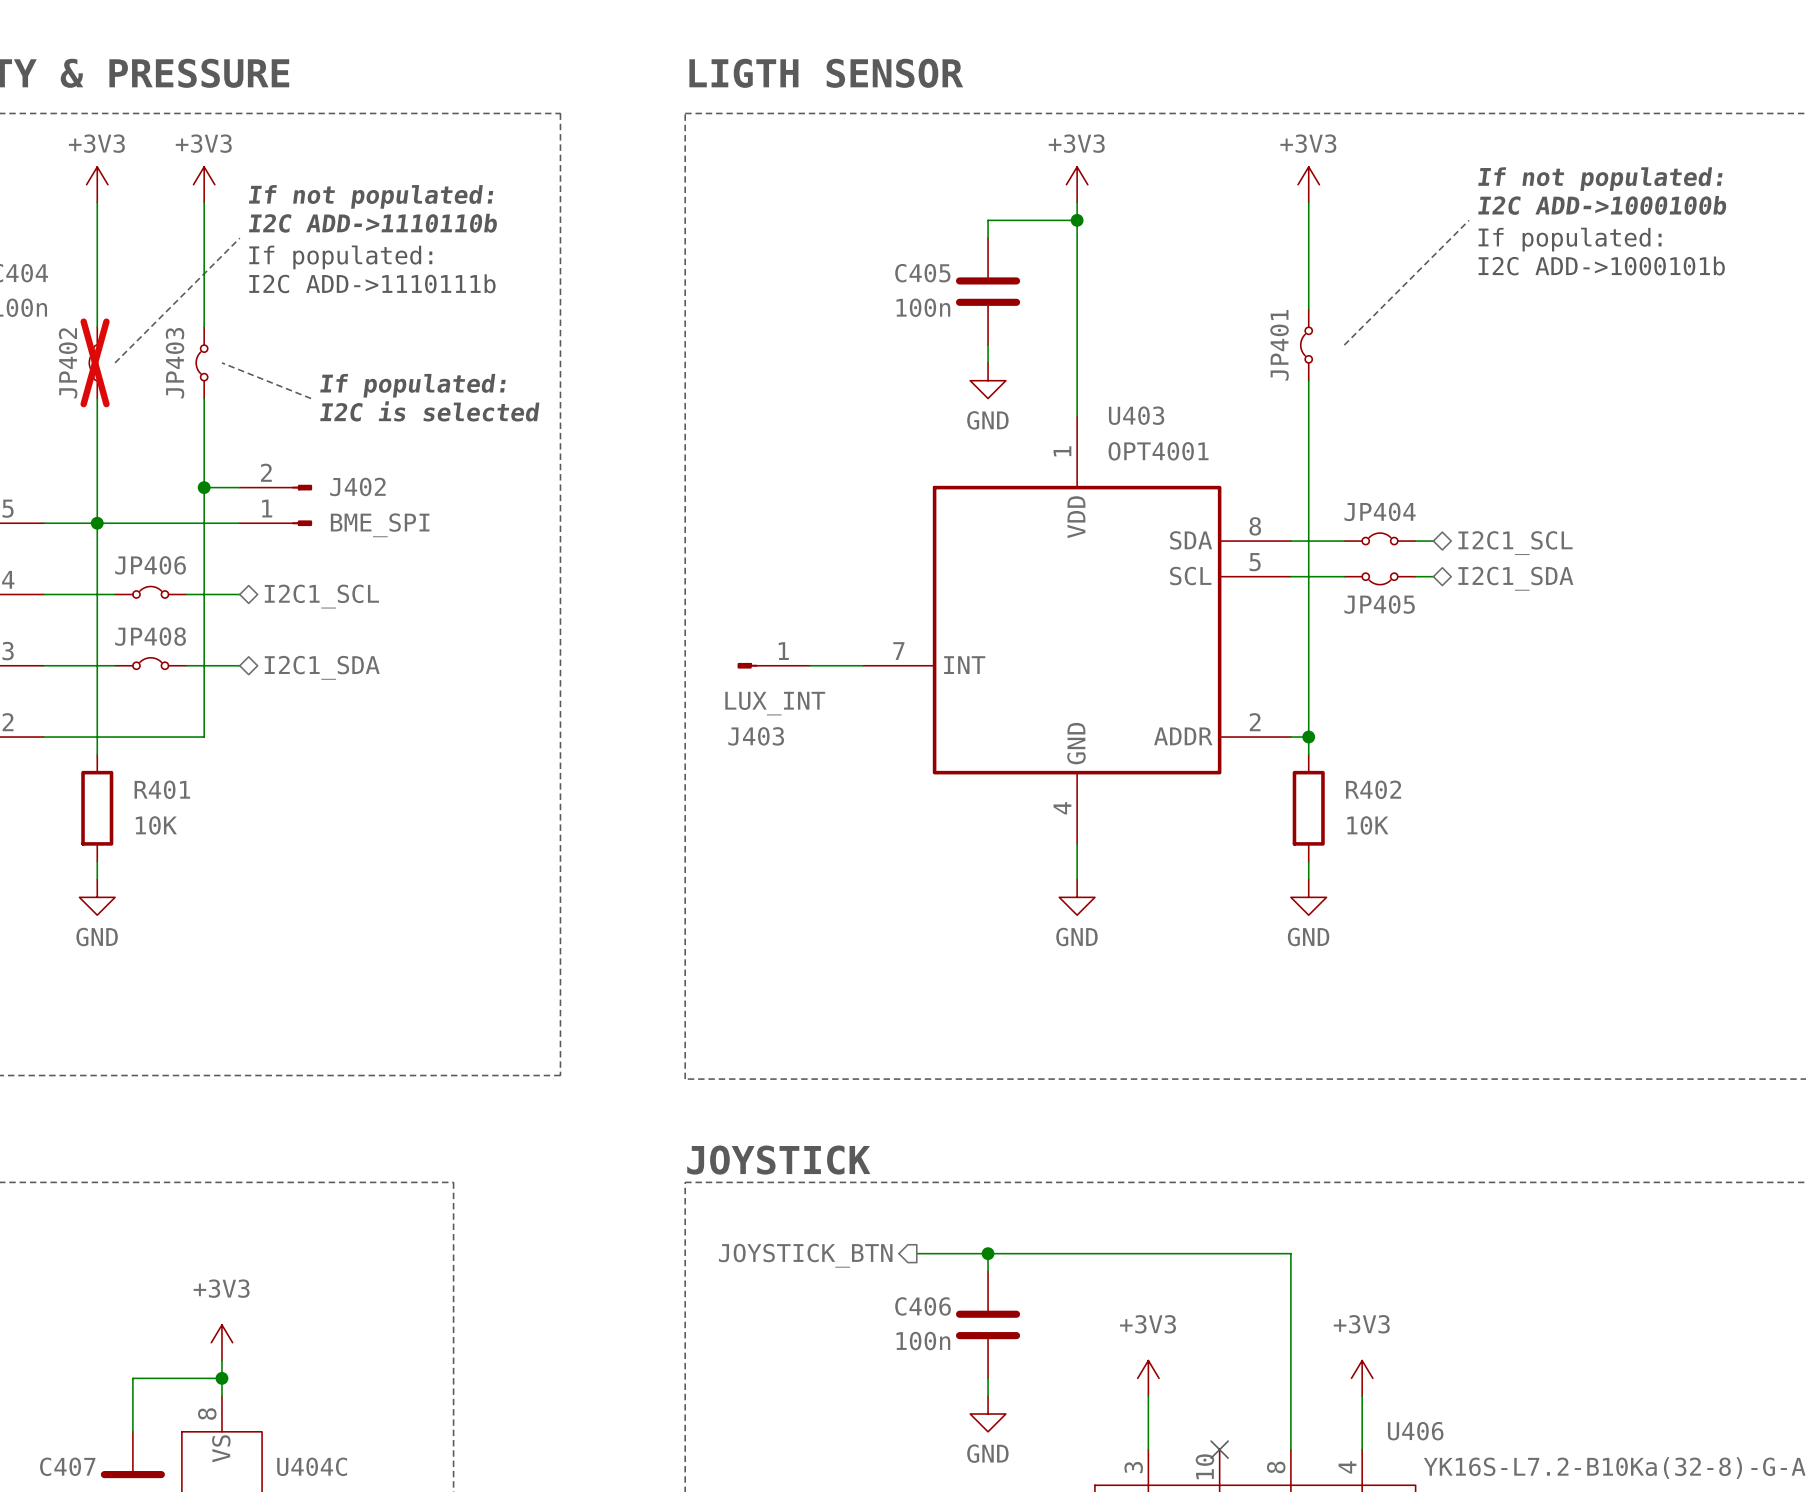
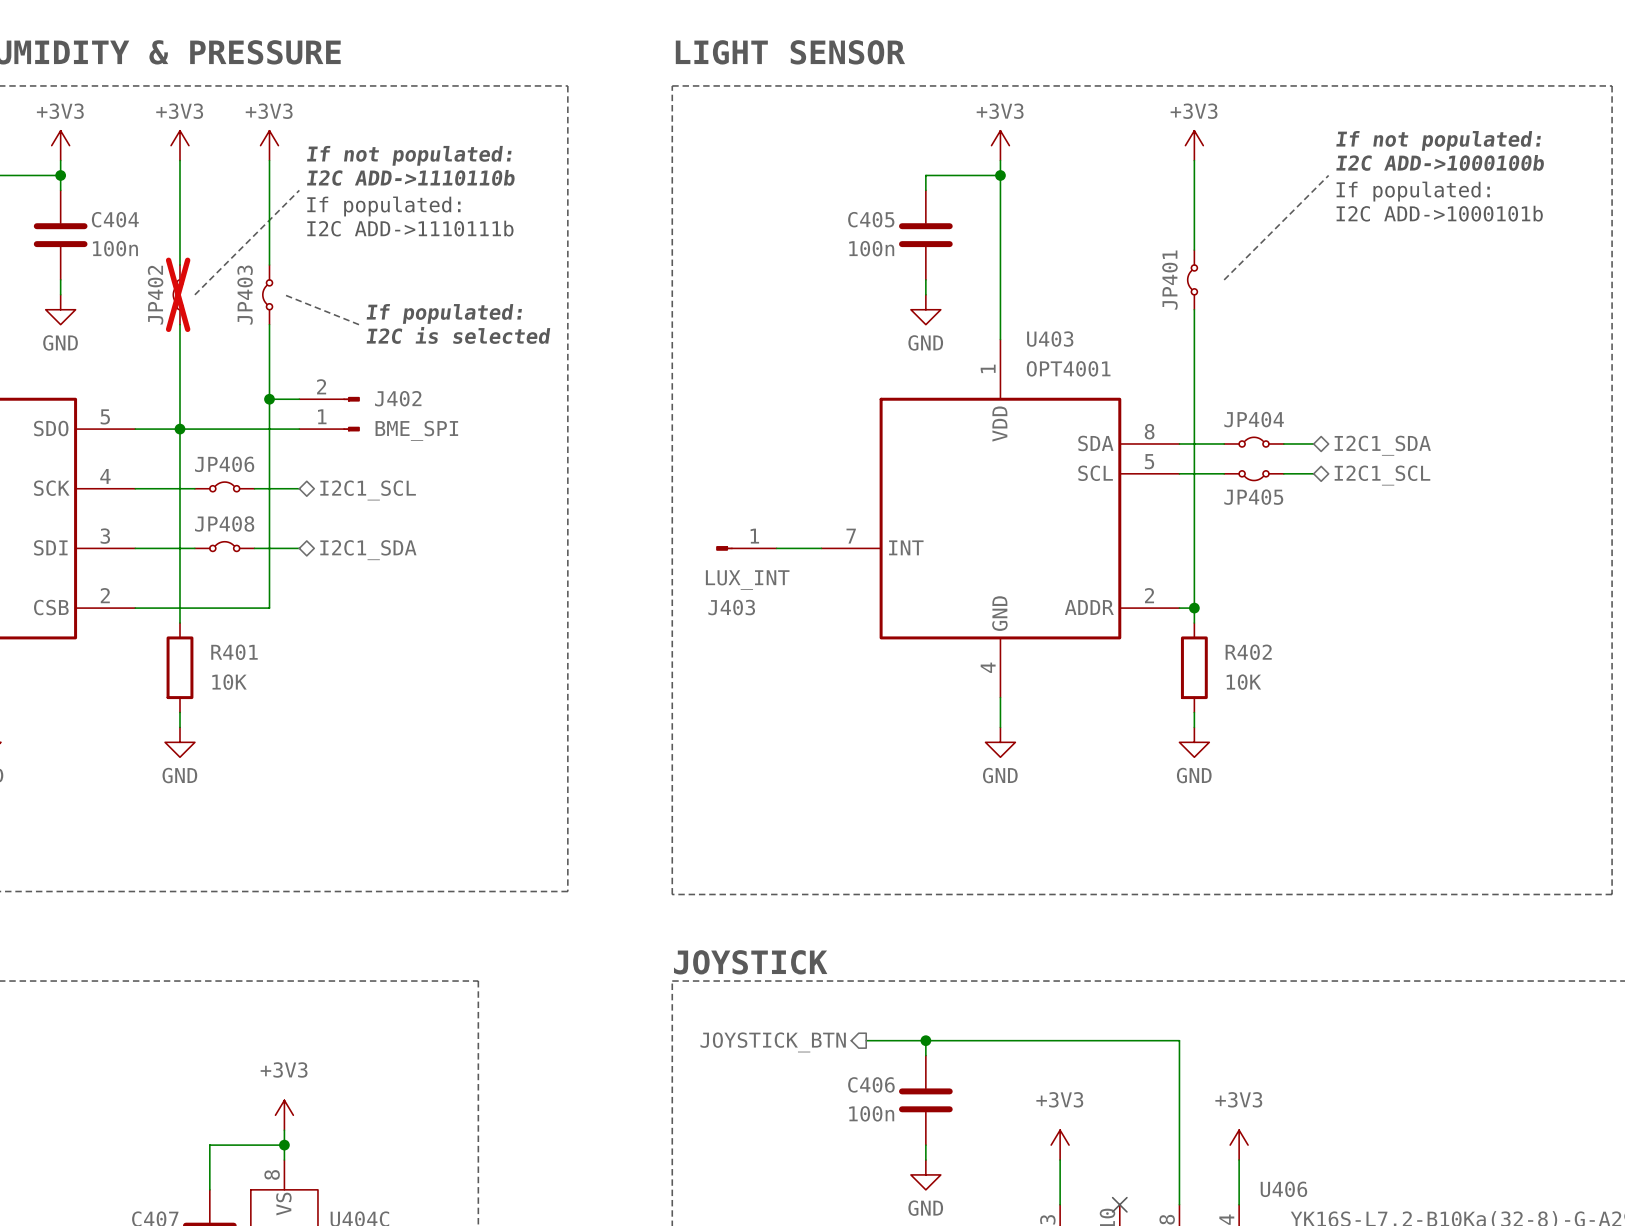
text: LIGTH SENSOR (826, 73) -> LIGHT SENSOR (790, 52)
wire: none -> (1298, 443) (1313, 443)
hierarchical label position: I2C1_SCL (1515, 543) -> I2C1_SCL (1382, 475)
wire: none -> (1298, 473) (1313, 473)
hierarchical label position: I2C1_SDA (1515, 578) -> I2C1_SDA (1382, 445)

